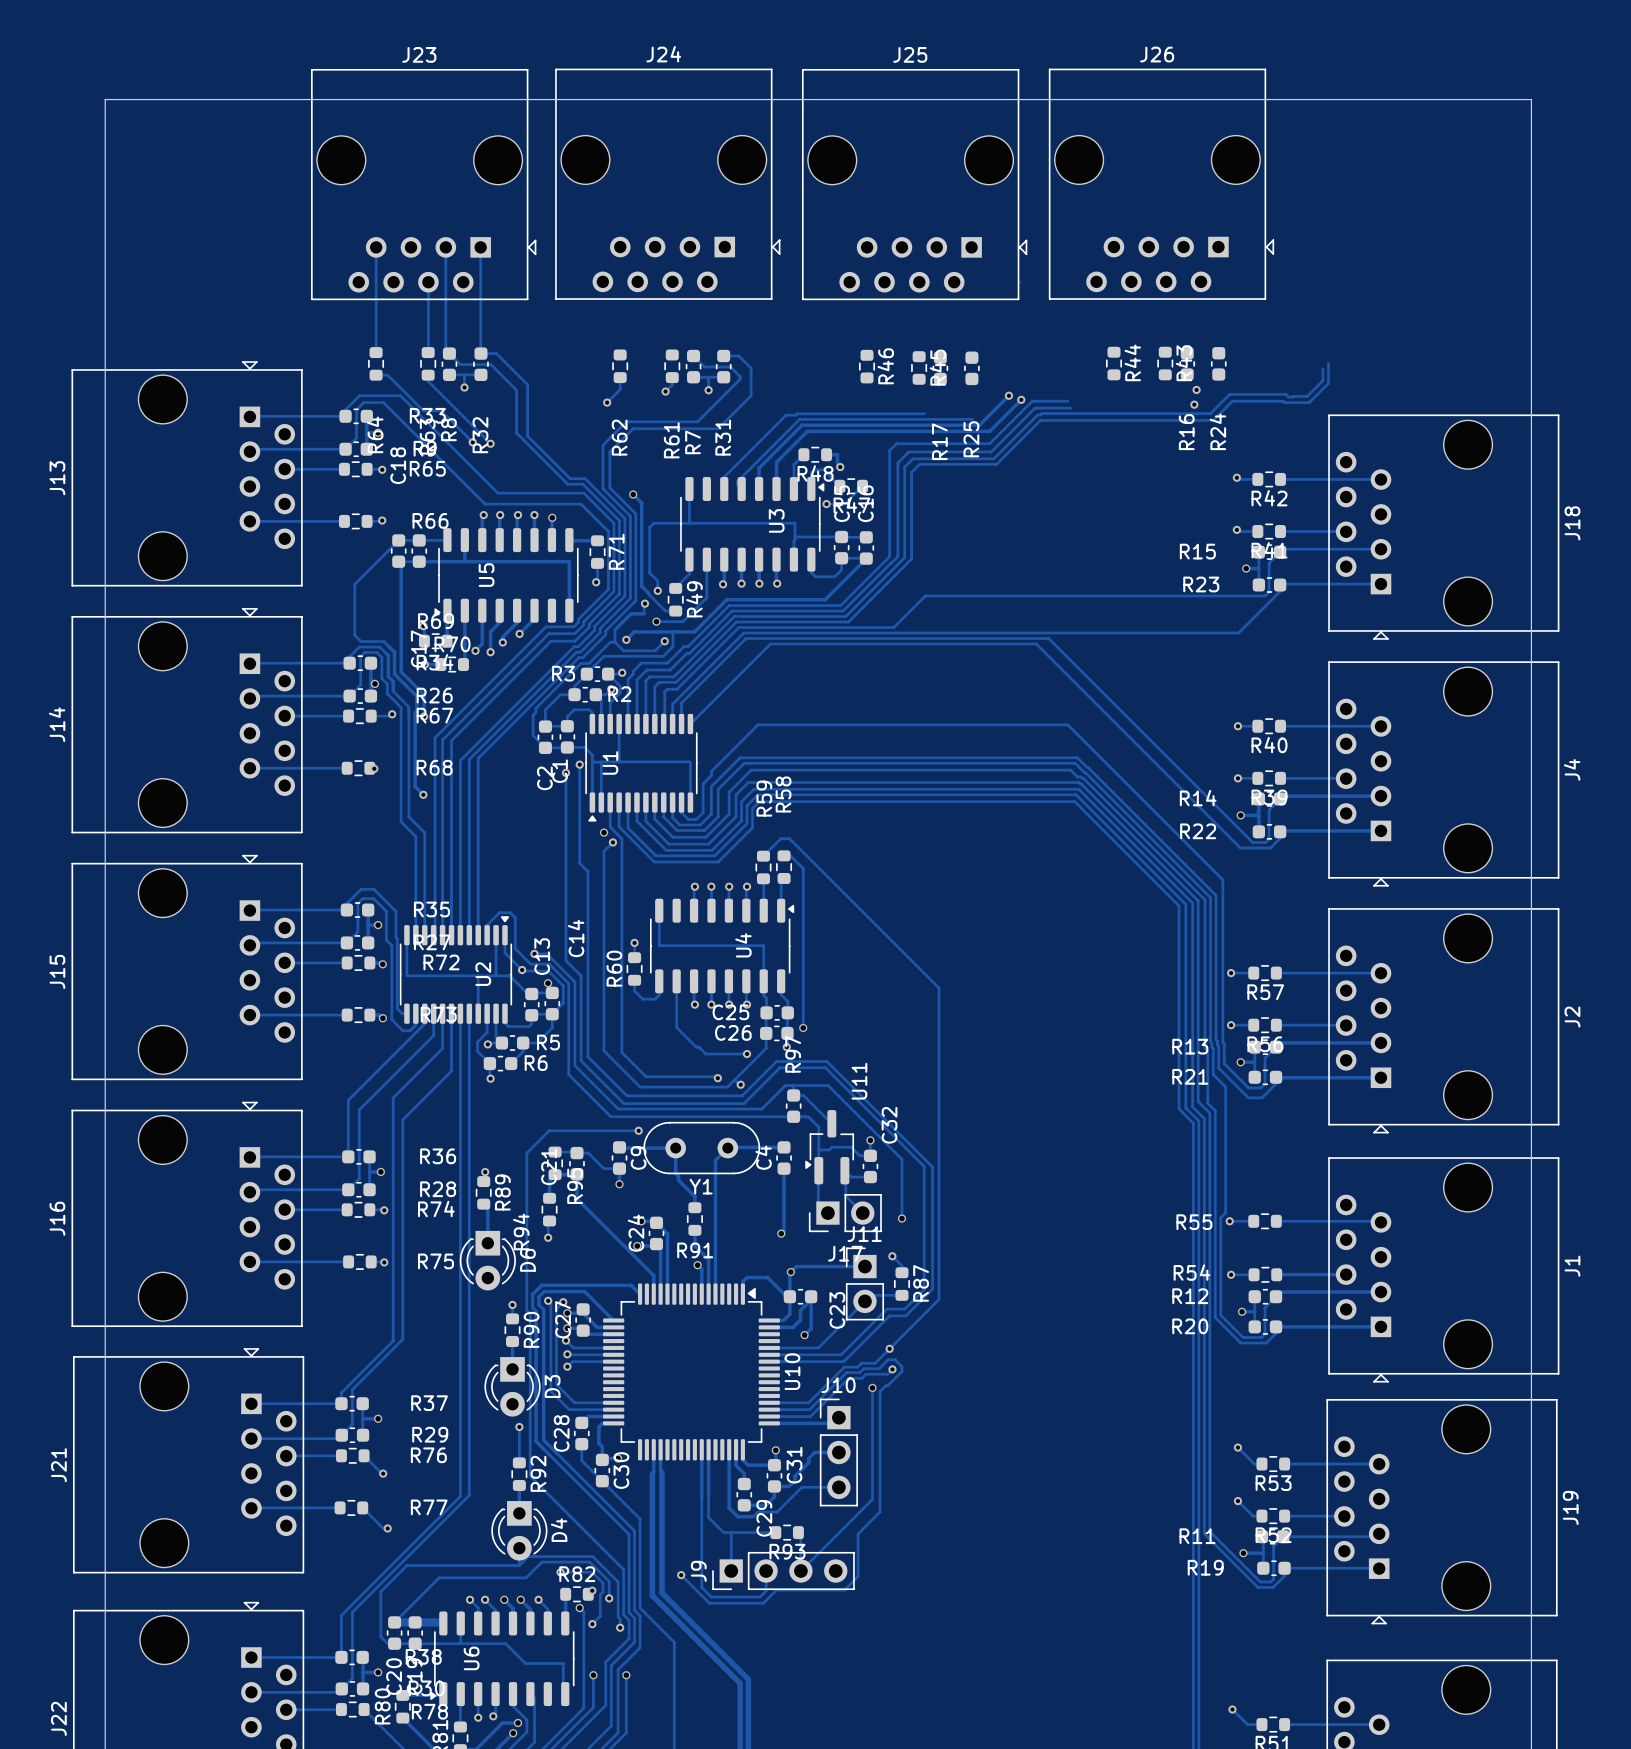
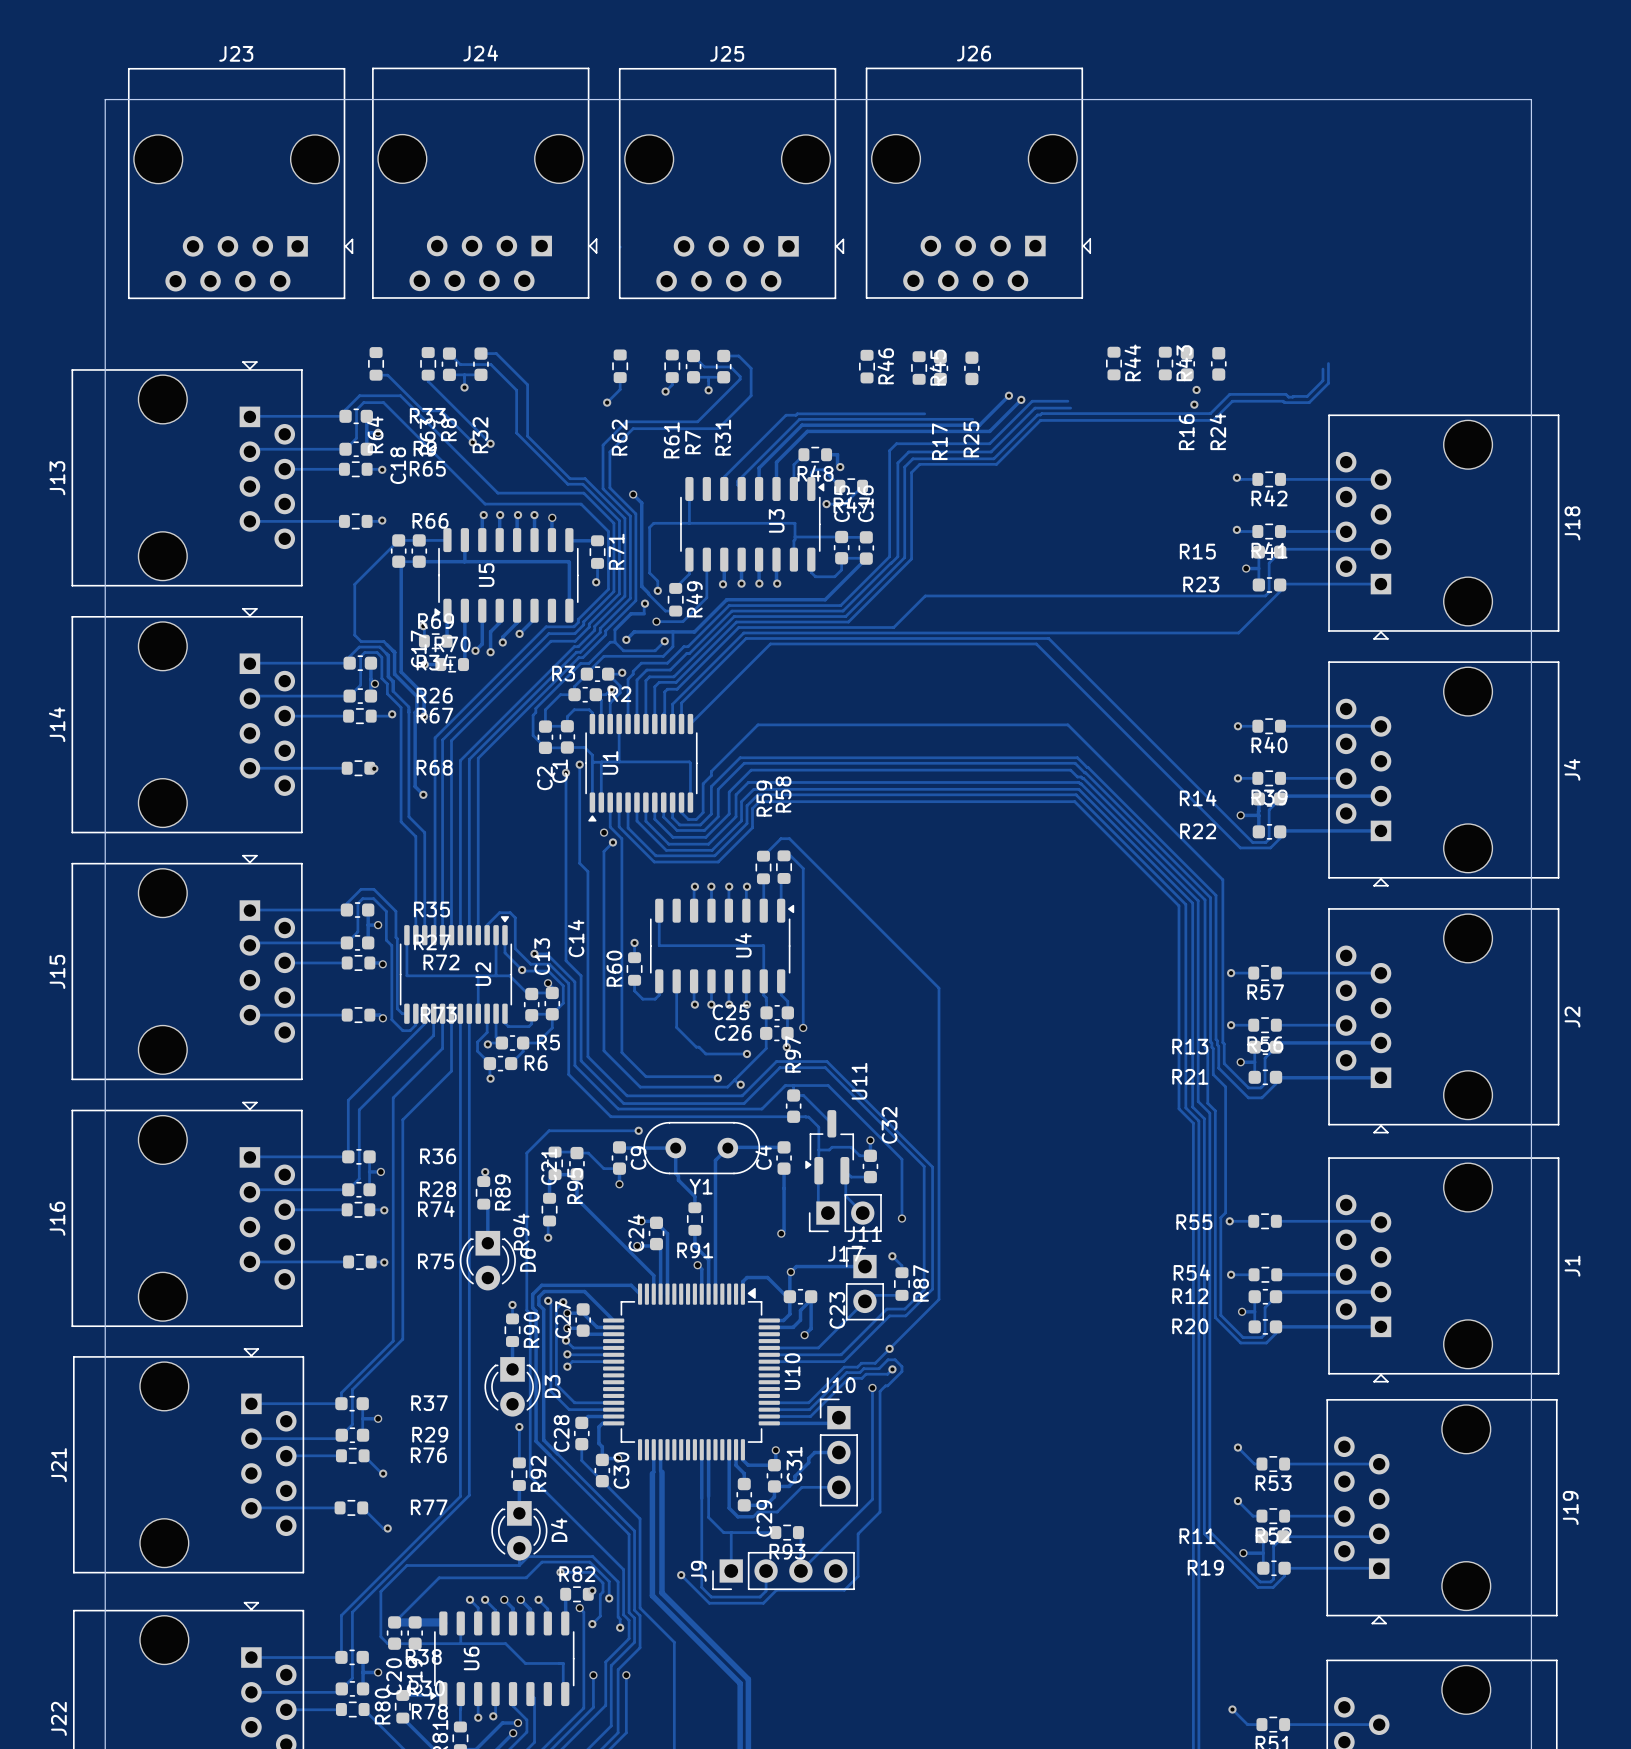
J23 position: (423, 184) -> (240, 183)
J24 position: (667, 184) -> (484, 183)
J25 position: (914, 184) -> (731, 183)
J26 position: (1161, 184) -> (978, 183)
track: (376, 247) (376, 352) -> none
track: (445, 247) (445, 349) -> none
track: (480, 247) (480, 353) -> none
track: (428, 282) (428, 352) -> none

